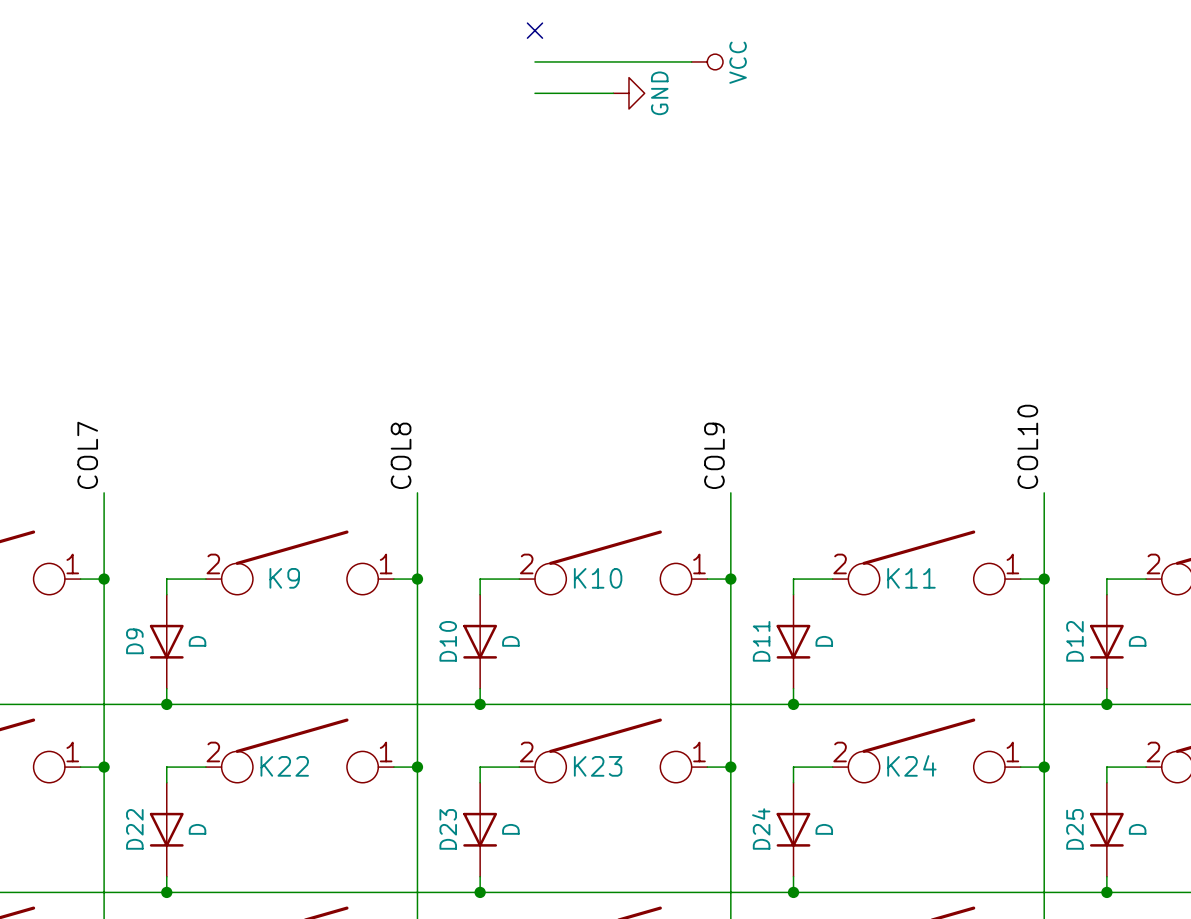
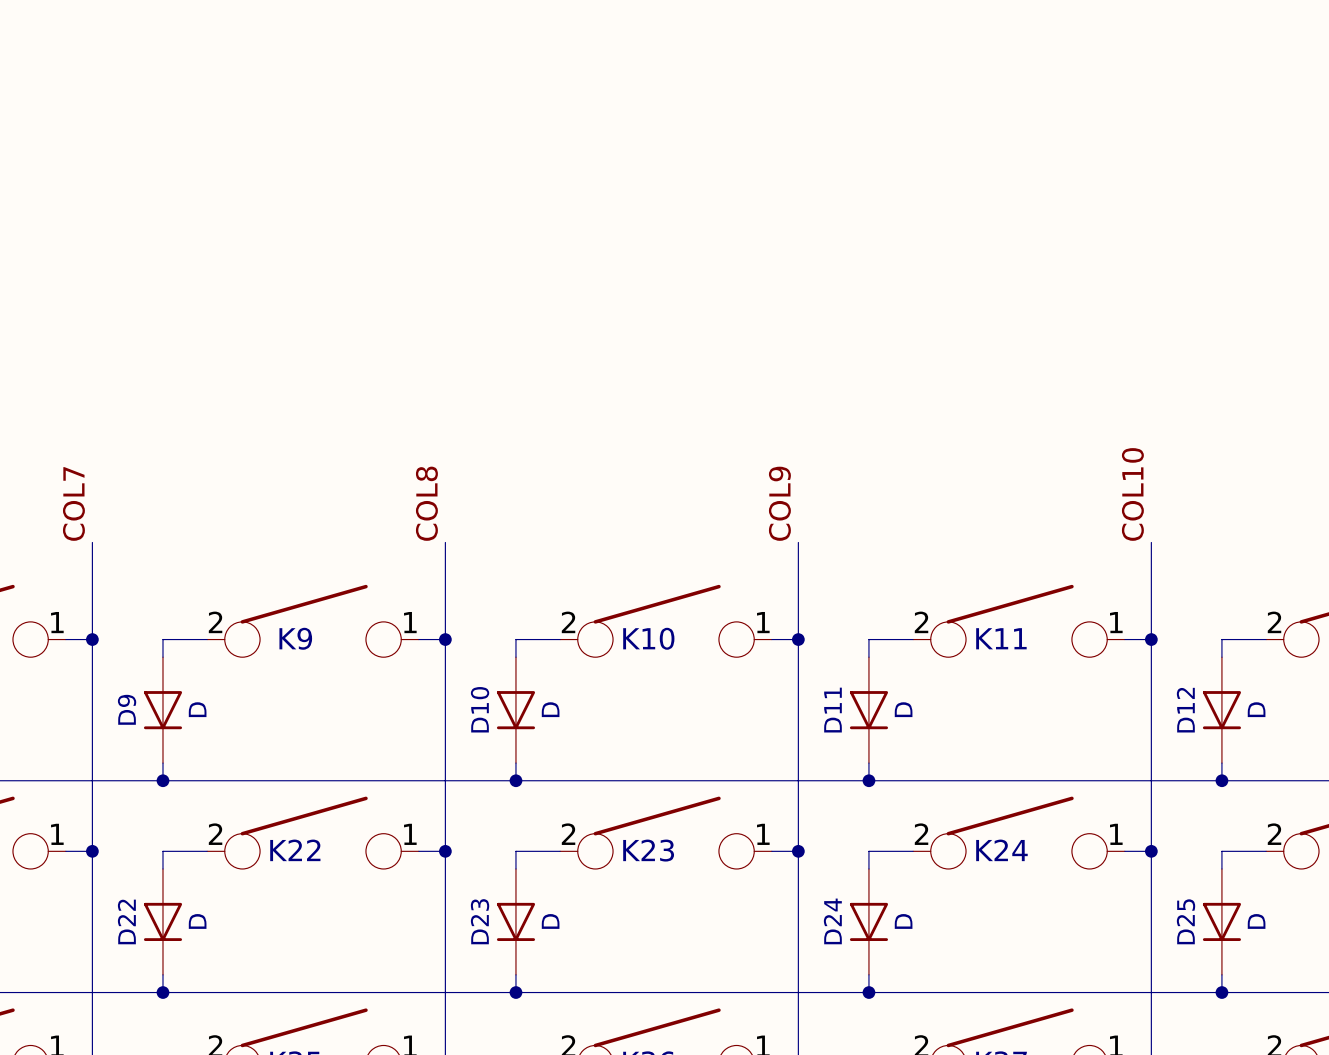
no-connect mark: (534, 30) -> none
wire: (534, 61) (691, 61) -> none
power symbol: VCC (707, 61) -> none
wire: (534, 93) (613, 93) -> none
power symbol: GND (628, 93) -> none

